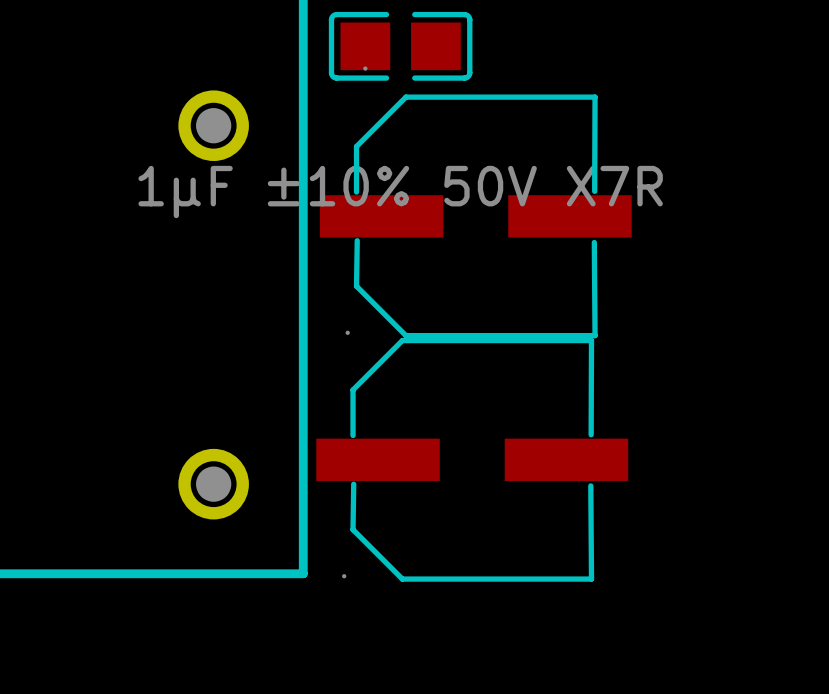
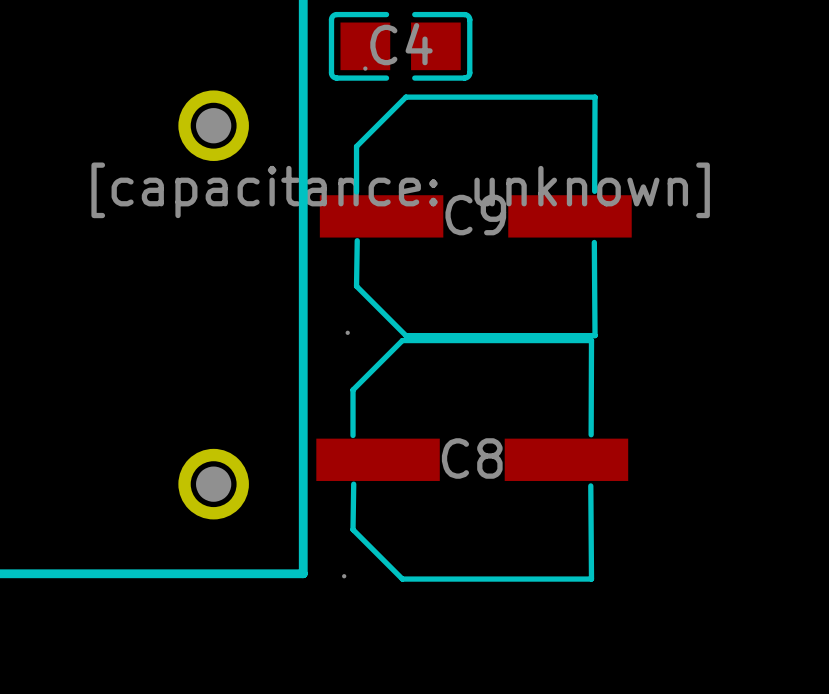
C4 name: none -> C4 (401, 44)
C4 value: 1µF ±10% 50V X7R (400, 192) -> [capacitance: unknown] (400, 190)
C9 name: none -> C9 (475, 215)
C8 name: none -> C8 (472, 458)

